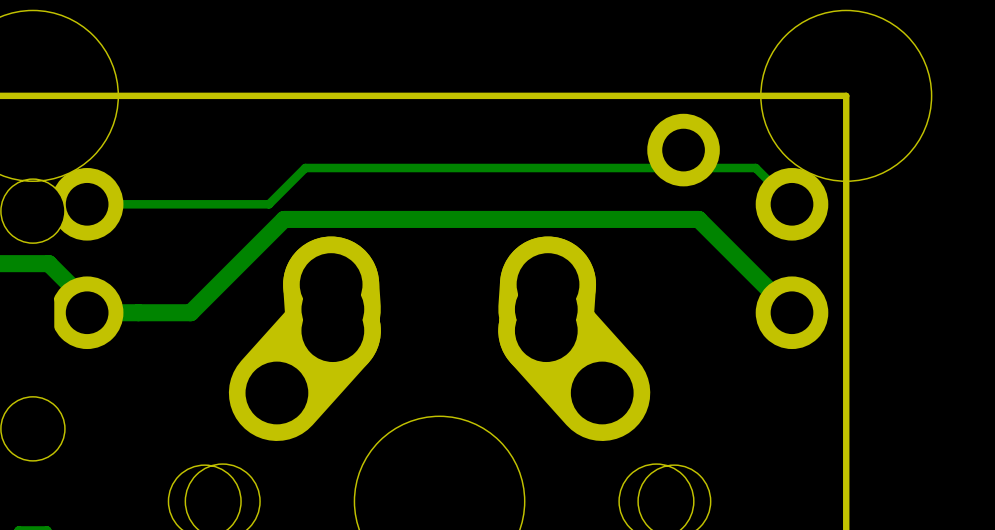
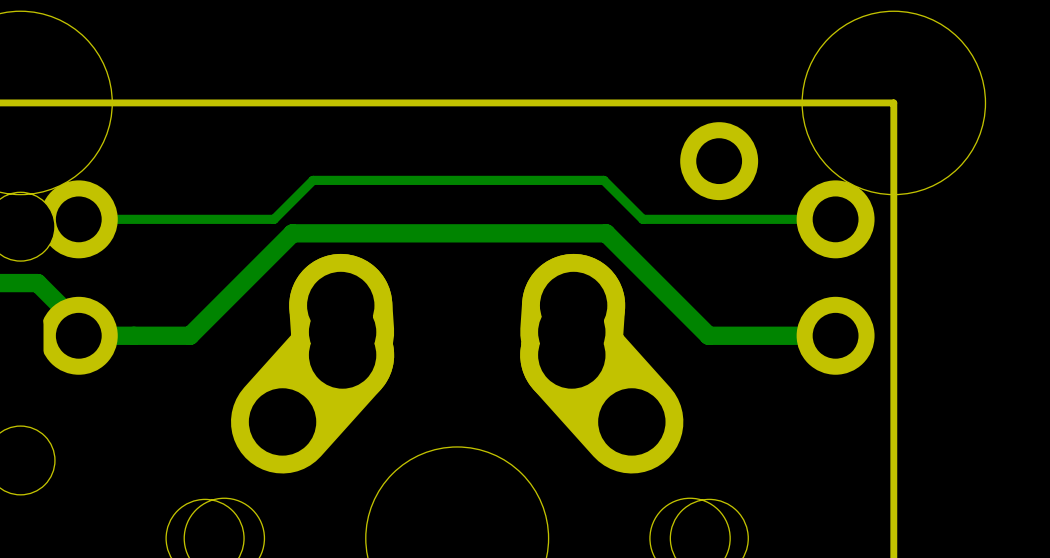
track: (576, 168) (755, 168) (792, 204) -> (603, 180) (642, 219) (835, 219)
track: (284, 219) (698, 219) (792, 312) -> (290, 235) (292, 233) (606, 233) (708, 335) (835, 335)

